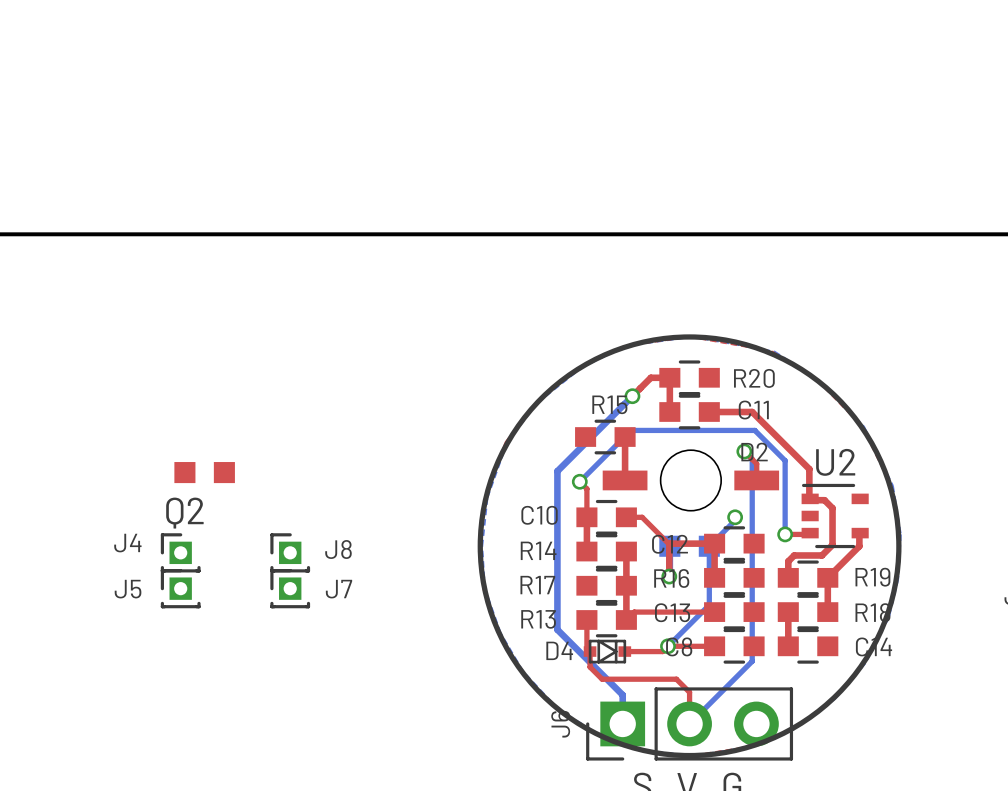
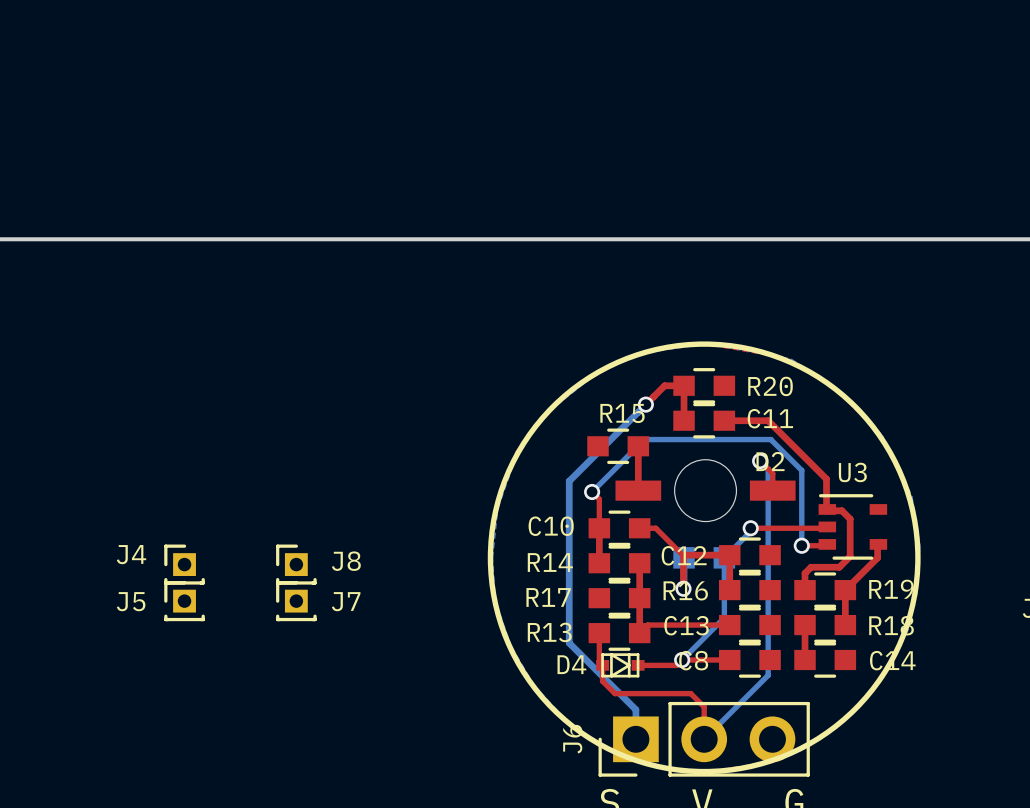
U2 name: U2 (835, 462) -> U3 (852, 472)
Q2: (204, 472) -> none
top track: none -> (750, 528) (826, 528)

